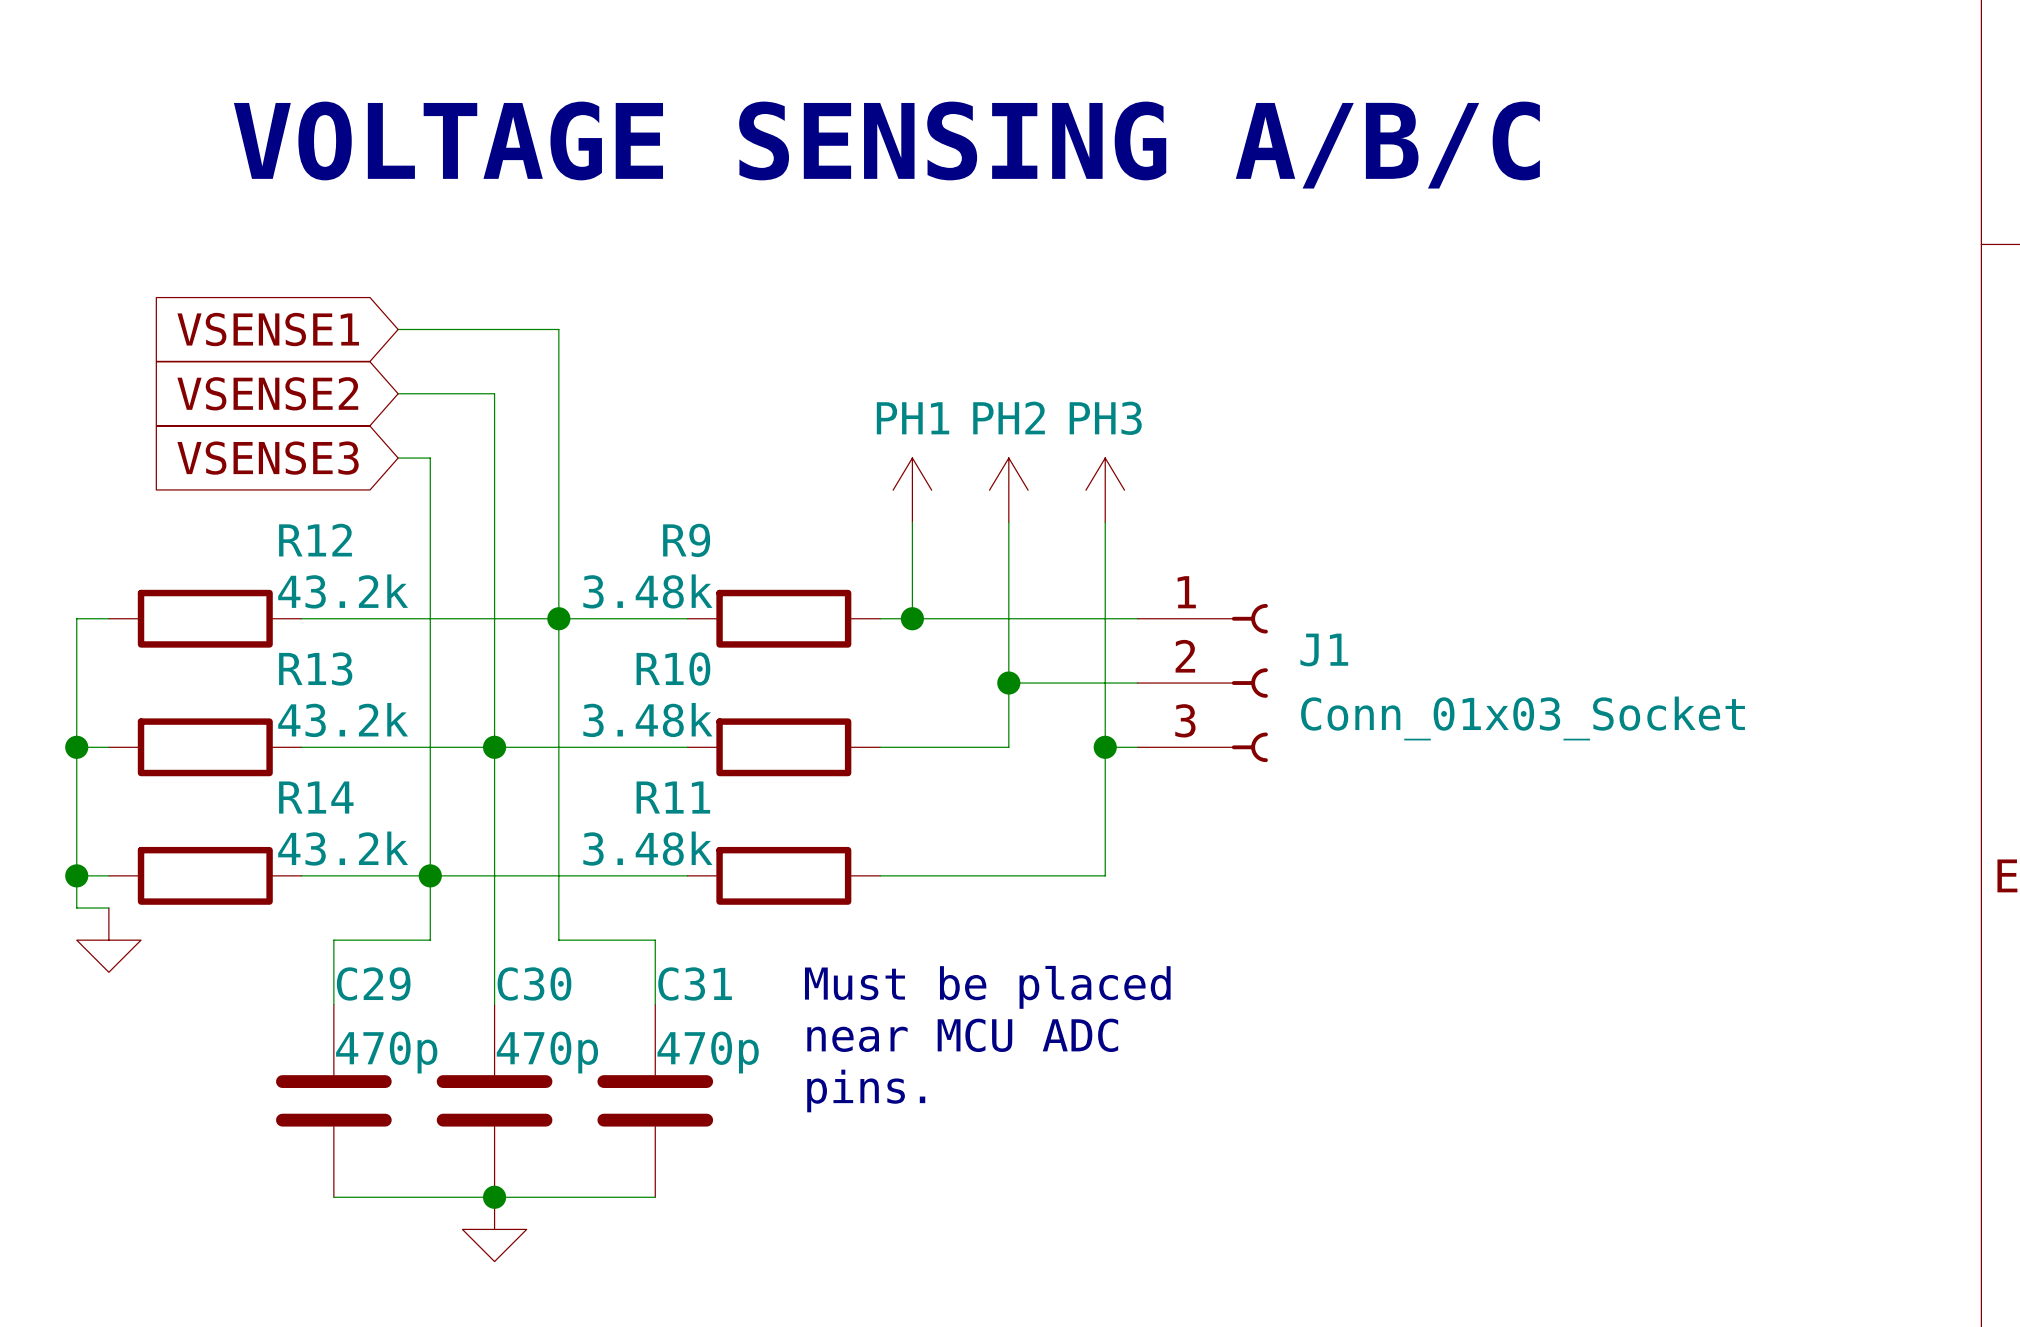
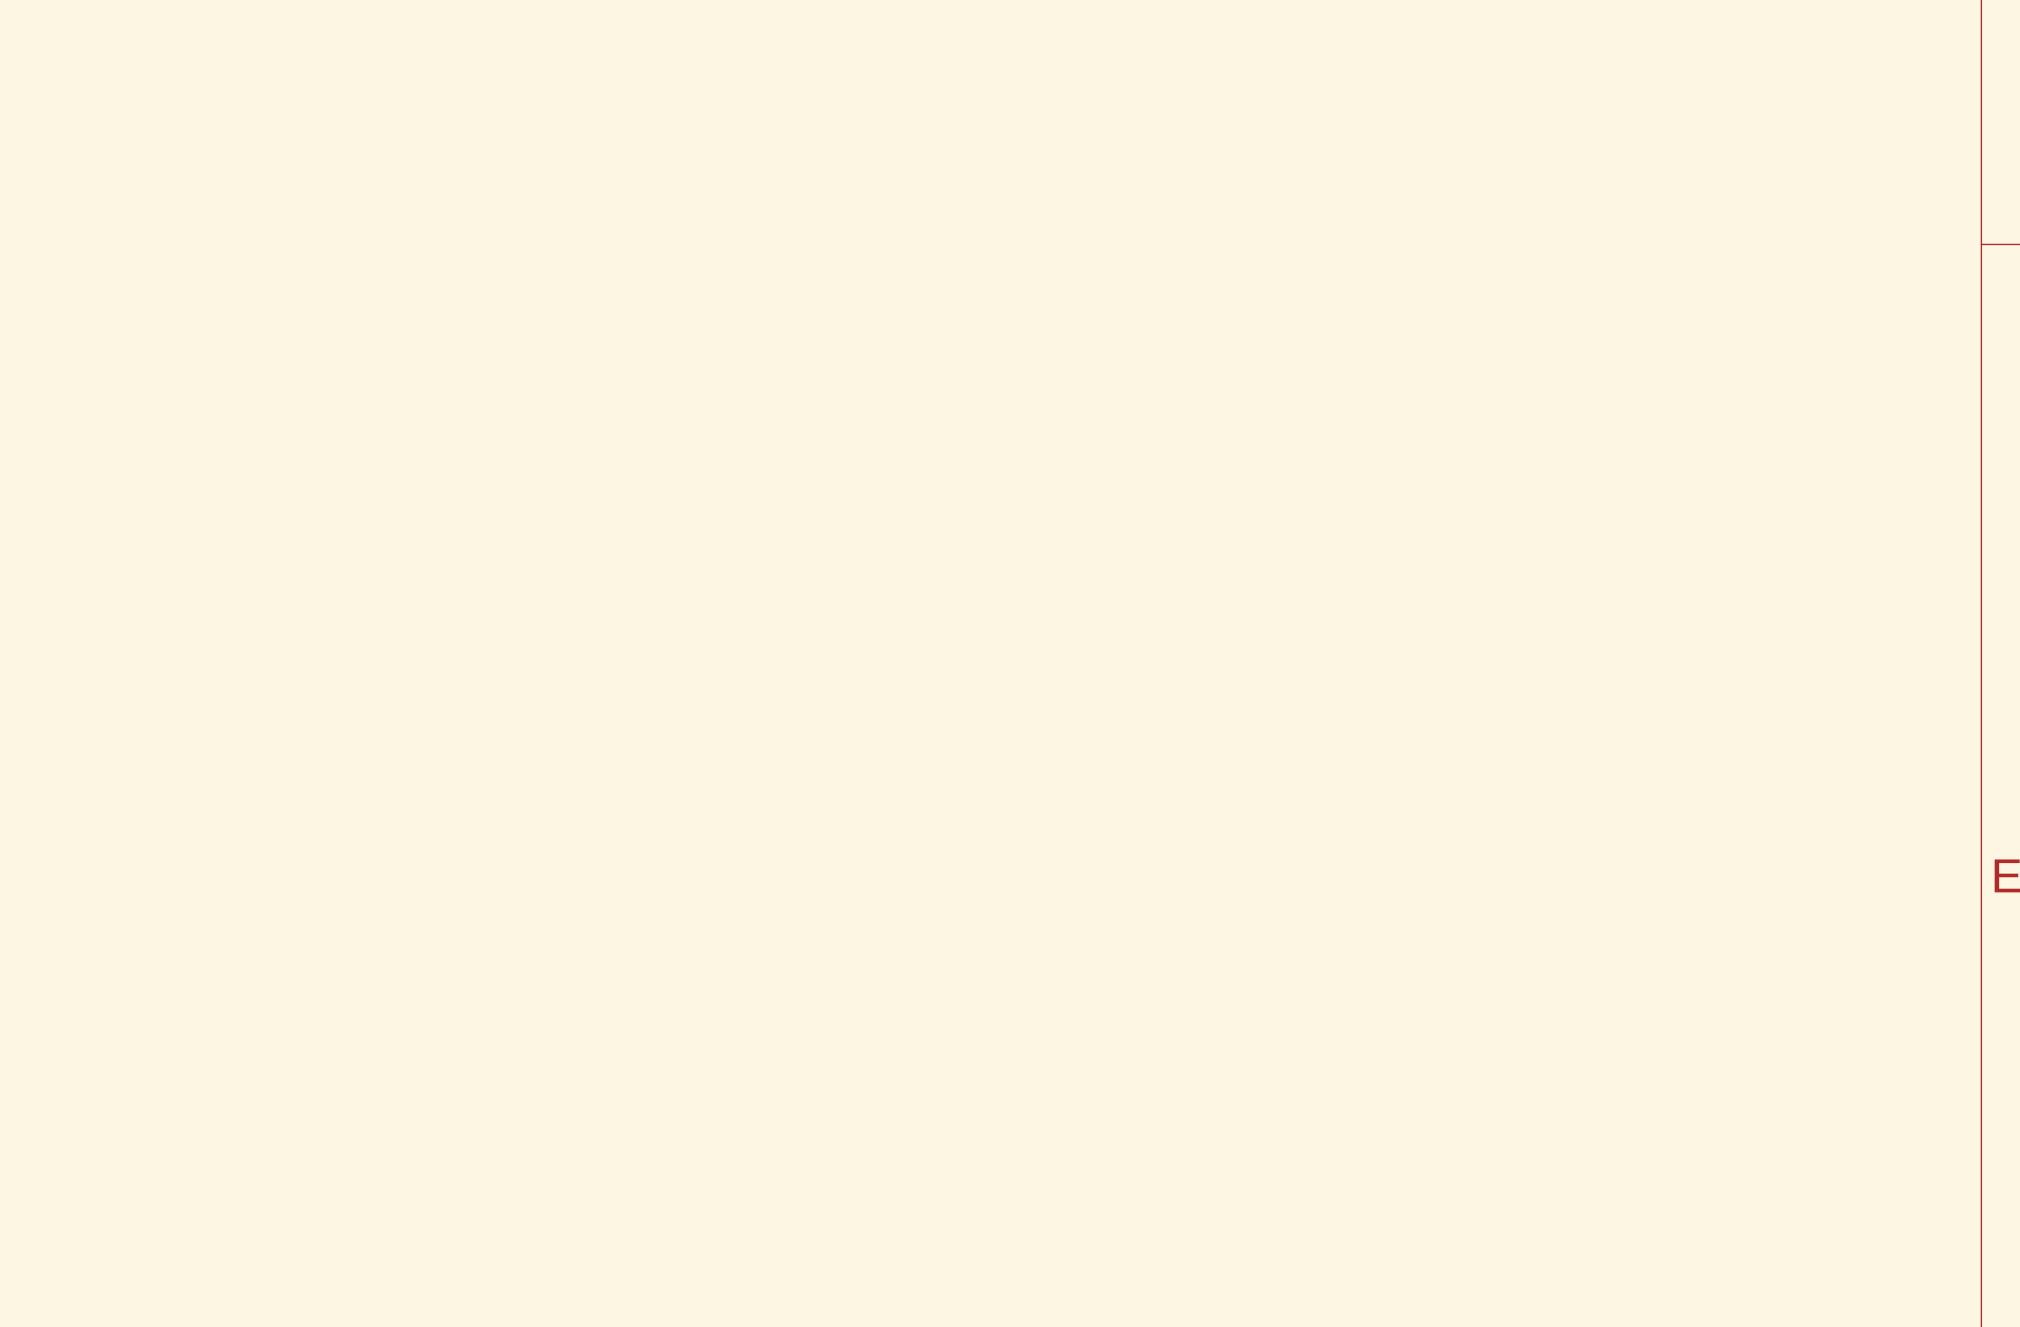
text: VOLTAGE SENSING A/B/C (886, 145) -> none
global label: VSENSE1 (268, 329) -> none
wire: (398, 329) (558, 329) (558, 940) (655, 940) (655, 1004) -> none
global label: VSENSE2 (267, 393) -> none
wire: (398, 393) (494, 393) (494, 1004) -> none
global label: VSENSE3 (268, 458) -> none
wire: (398, 458) (430, 458) (430, 940) (333, 940) (333, 1004) -> none
power symbol: PH1 (912, 490) -> none
power symbol: PH2 (1008, 490) -> none
power symbol: PH3 (1105, 490) -> none
wire: (912, 522) (912, 618) -> none
wire: (1008, 522) (1008, 747) (880, 747) -> none
wire: (1105, 522) (1105, 875) (880, 875) -> none
wire: (108, 618) (76, 618) (76, 908) (108, 908) -> none
R12: 43.2k (205, 618) -> none
wire: (301, 618) (687, 618) -> none
junction: (558, 618) -> none
R9: 3.48k (783, 618) -> none
wire: (880, 618) (1137, 618) -> none
junction: (912, 618) -> none
wire: (1008, 683) (1137, 683) -> none
junction: (1008, 683) -> none
J1: Conn_01x03_Socket (1202, 683) -> none
wire: (76, 747) (108, 747) -> none
junction: (76, 747) -> none
R13: 43.2k (205, 747) -> none
wire: (301, 747) (687, 747) -> none
junction: (494, 747) -> none
R10: 3.48k (783, 747) -> none
wire: (1105, 747) (1137, 747) -> none
junction: (1105, 747) -> none
wire: (76, 875) (108, 875) -> none
junction: (76, 875) -> none
R14: 43.2k (205, 875) -> none
wire: (301, 875) (687, 875) -> none
junction: (430, 875) -> none
R11: 3.48k (783, 875) -> none
power symbol: (108, 940) -> none
text: Must be placed (987, 987) -> none
text: near MCU ADC (962, 1035) -> none
text: pins. (866, 1090) -> none
C29: 470p (333, 1100) -> none
C30: 470p (494, 1100) -> none
C31: 470p (655, 1100) -> none
wire: (333, 1197) (655, 1197) -> none
junction: (494, 1197) -> none
power symbol: (494, 1229) -> none

